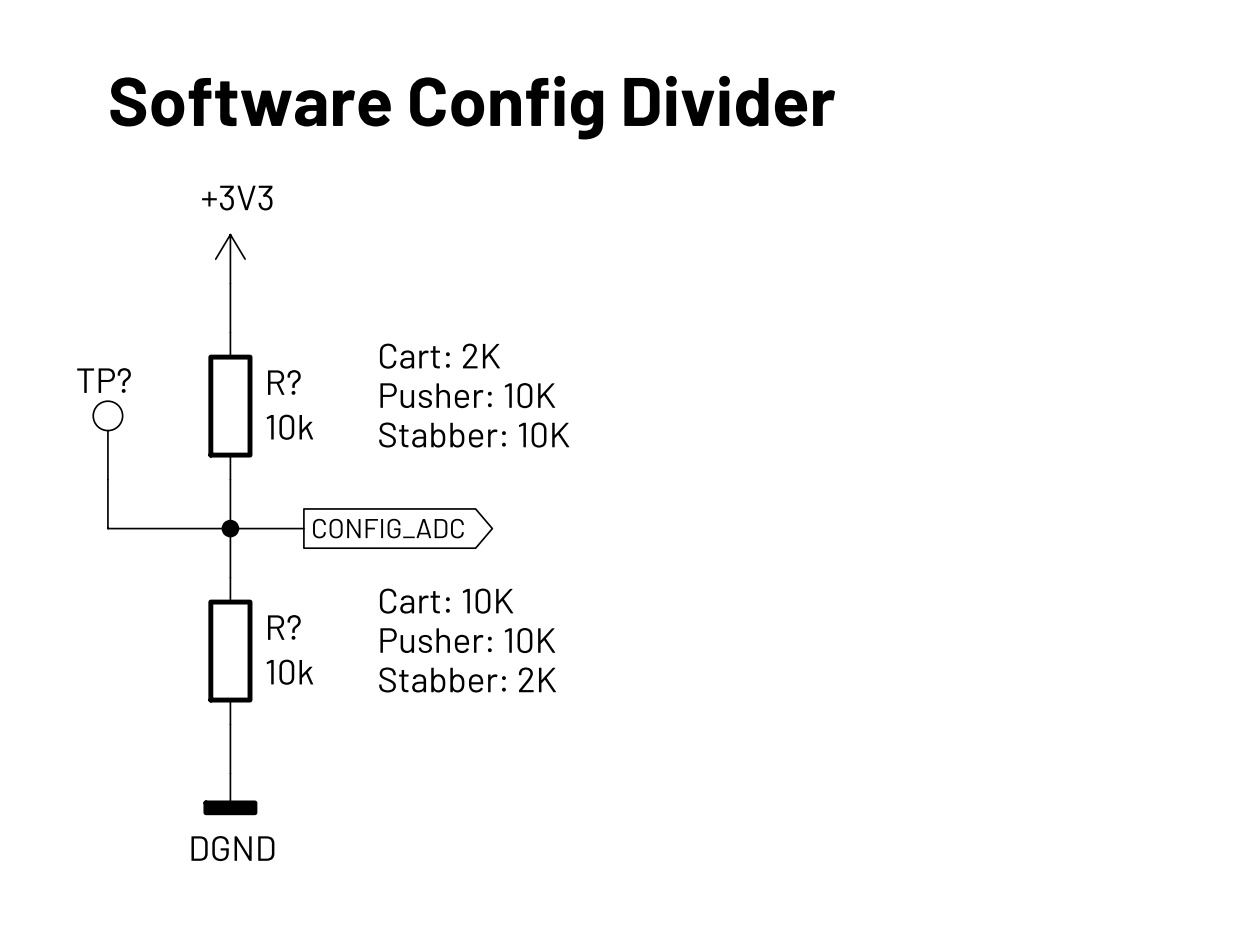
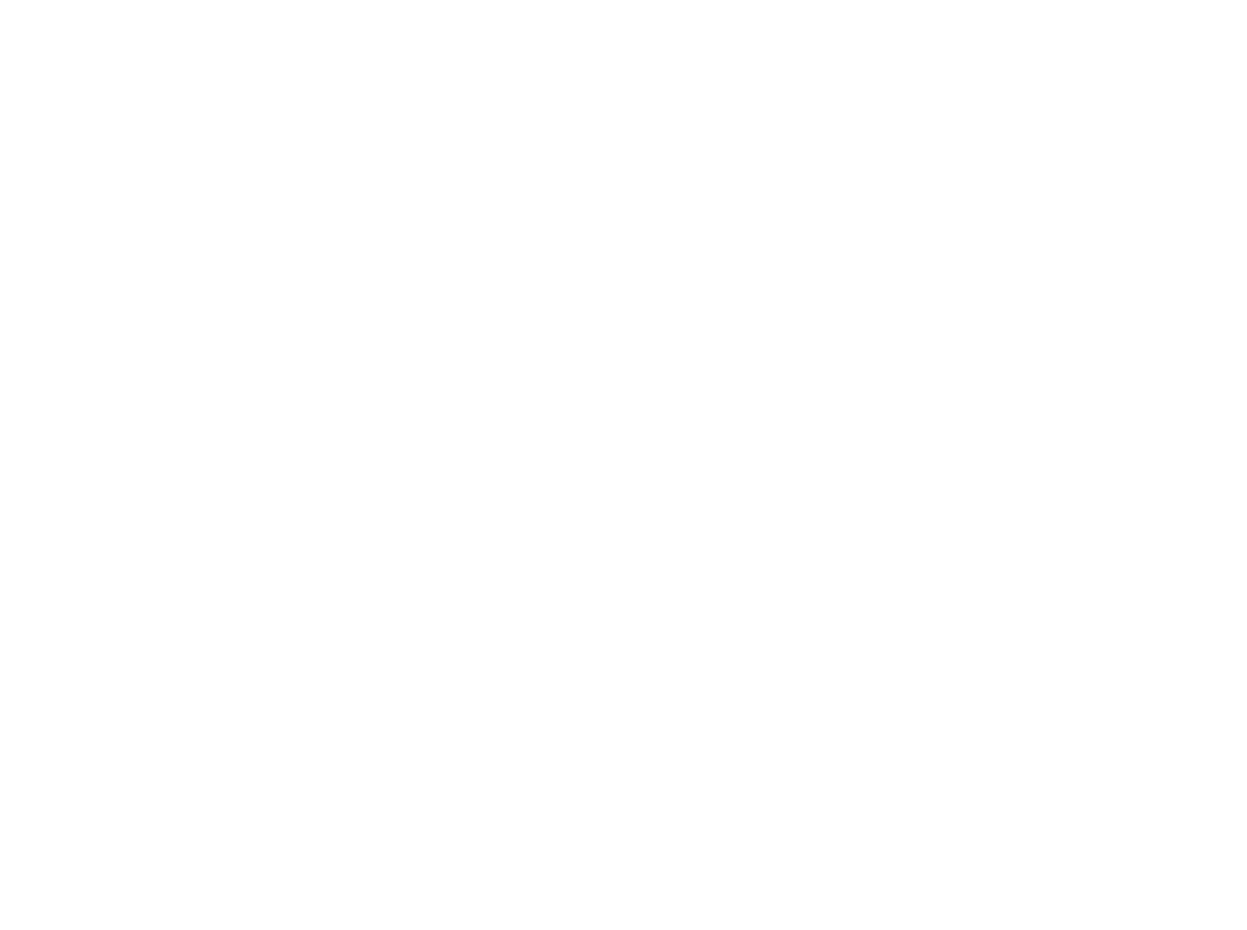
text: Software Config Divider (472, 107) -> none
power symbol: +3V3 (230, 259) -> none
wire: (230, 283) (230, 332) -> none
text: Cart: 2K (439, 356) -> none
text: Pusher: 10K (467, 395) -> none
R?: 10k (230, 406) -> none
text: Stabber: 10K (474, 435) -> none
TP?: (107, 440) -> none
wire: (107, 479) (107, 528) (303, 528) -> none
wire: (230, 479) (230, 577) -> none
junction: (230, 528) -> none
global label: CONFIG_ADC (388, 528) -> none
text: Cart: 10K (446, 601) -> none
text: Pusher: 10K (467, 640) -> none
R?: 10k (230, 651) -> none
text: Stabber: 2K (467, 680) -> none
wire: (230, 724) (230, 773) -> none
power symbol: DGND (230, 794) -> none

